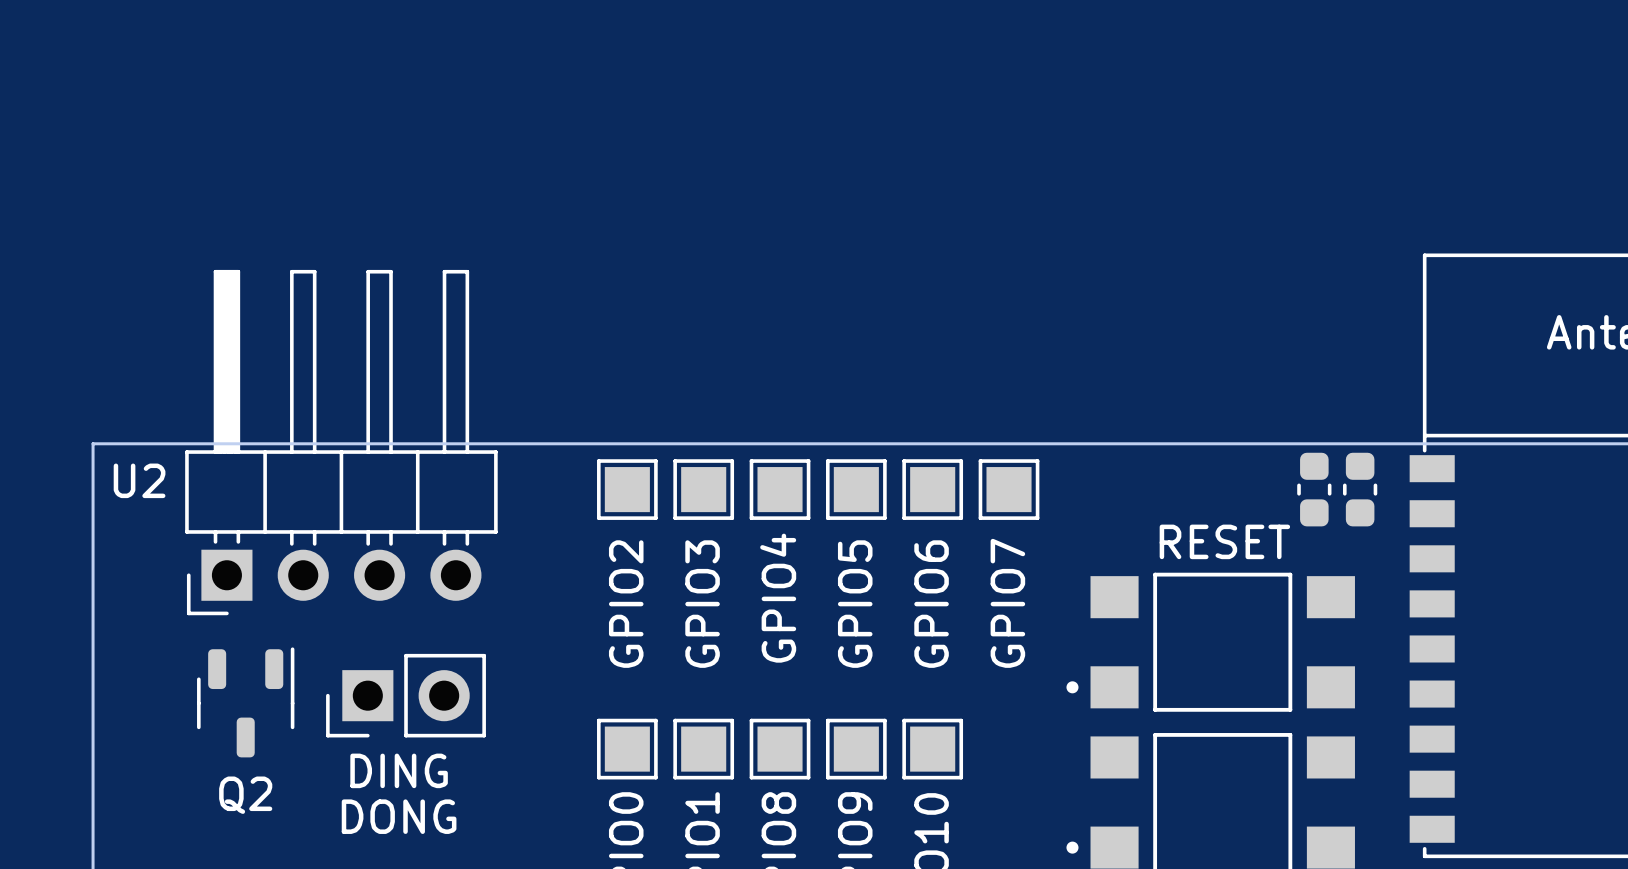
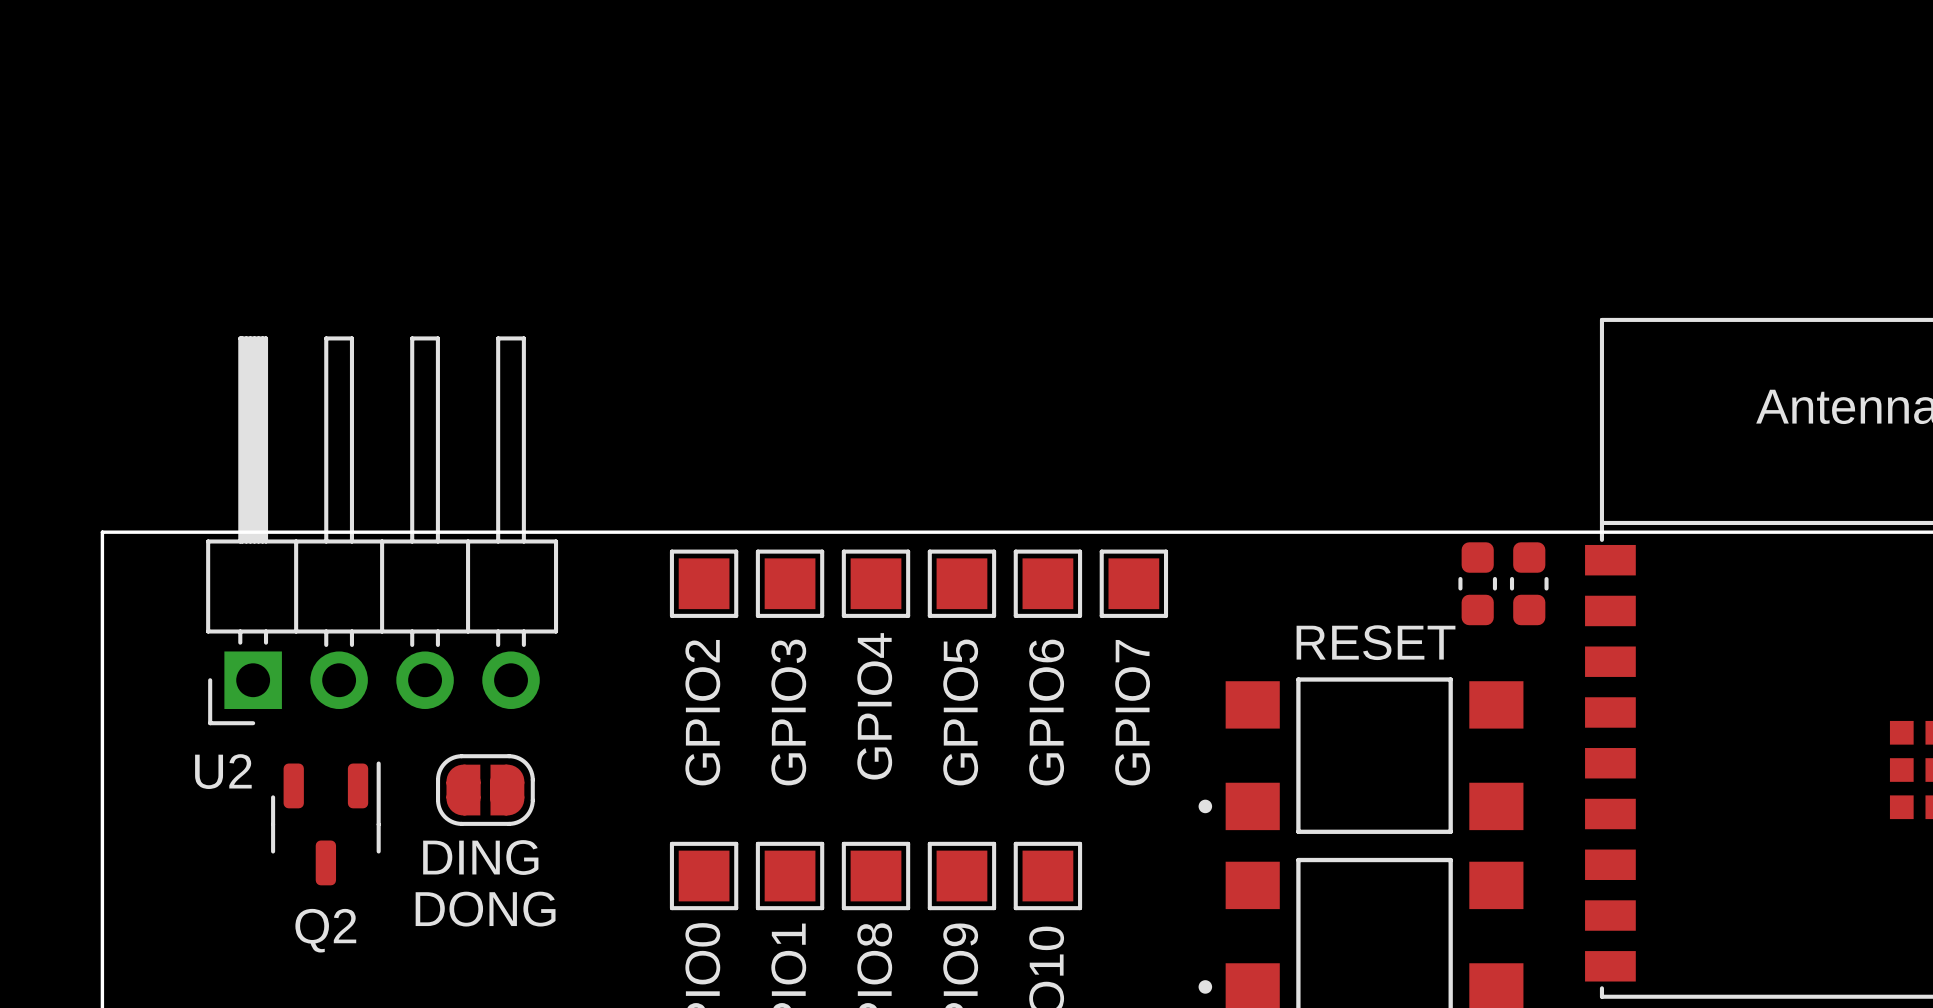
U2 name position: U2 (139, 480) -> U2 (223, 771)
part: none -> (485, 790)
part: (406, 695) -> none
Q2 position: (245, 702) -> (325, 823)

